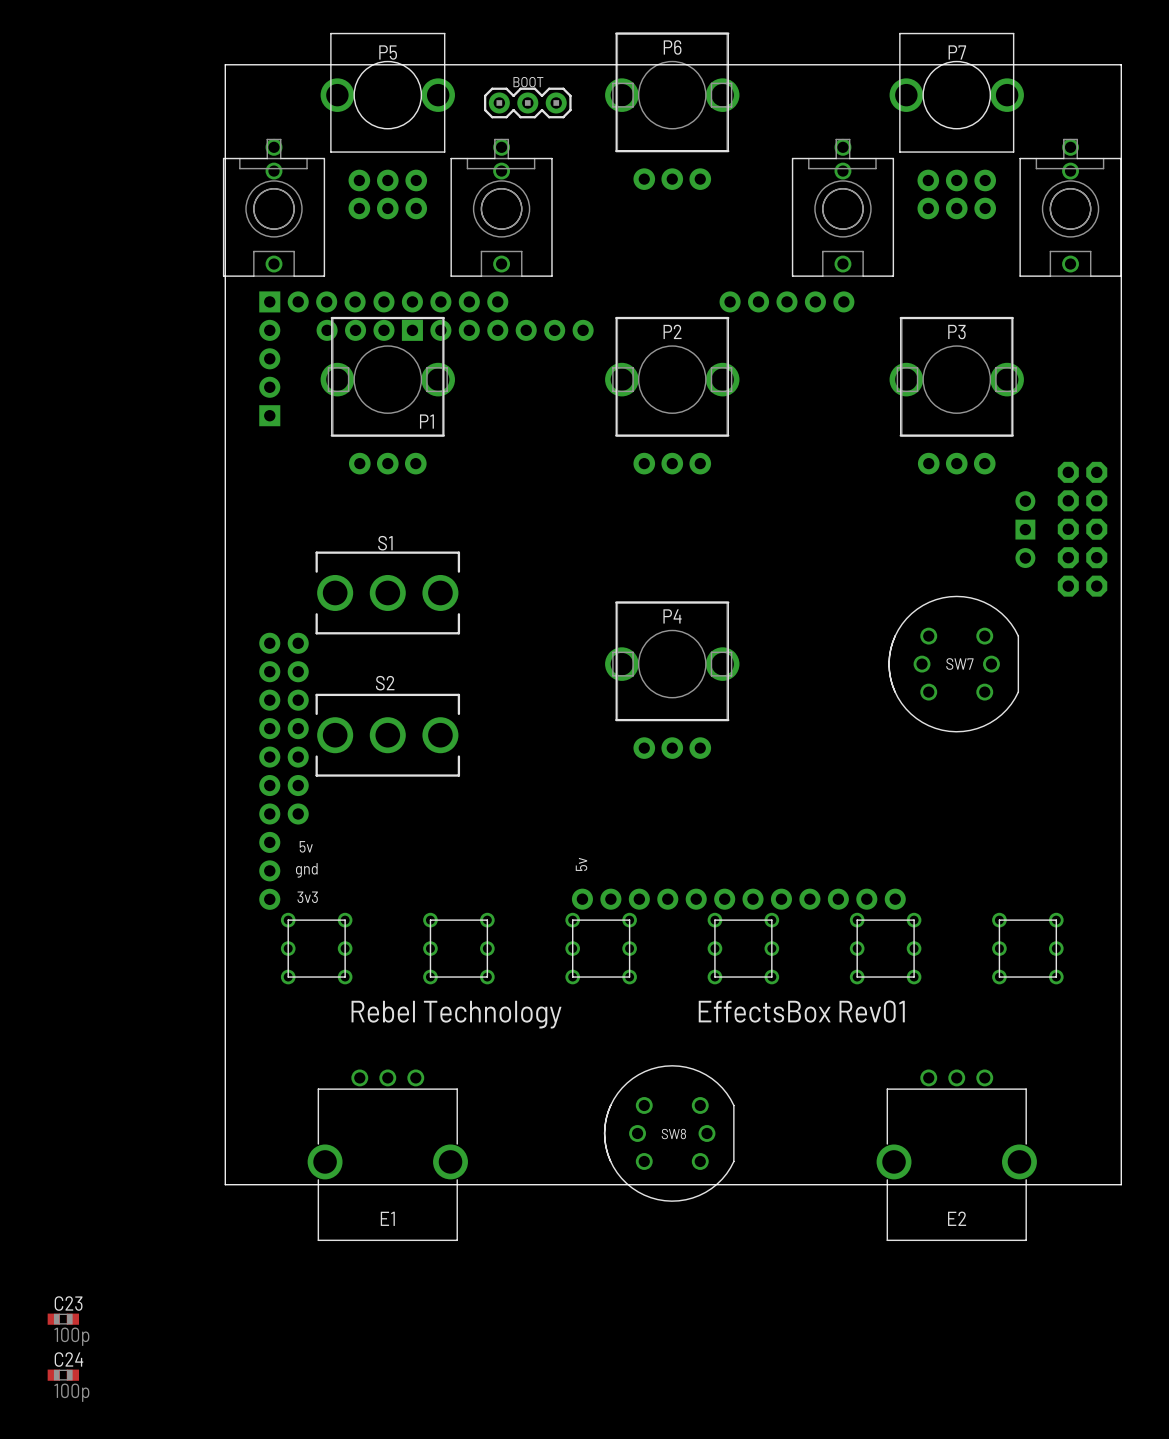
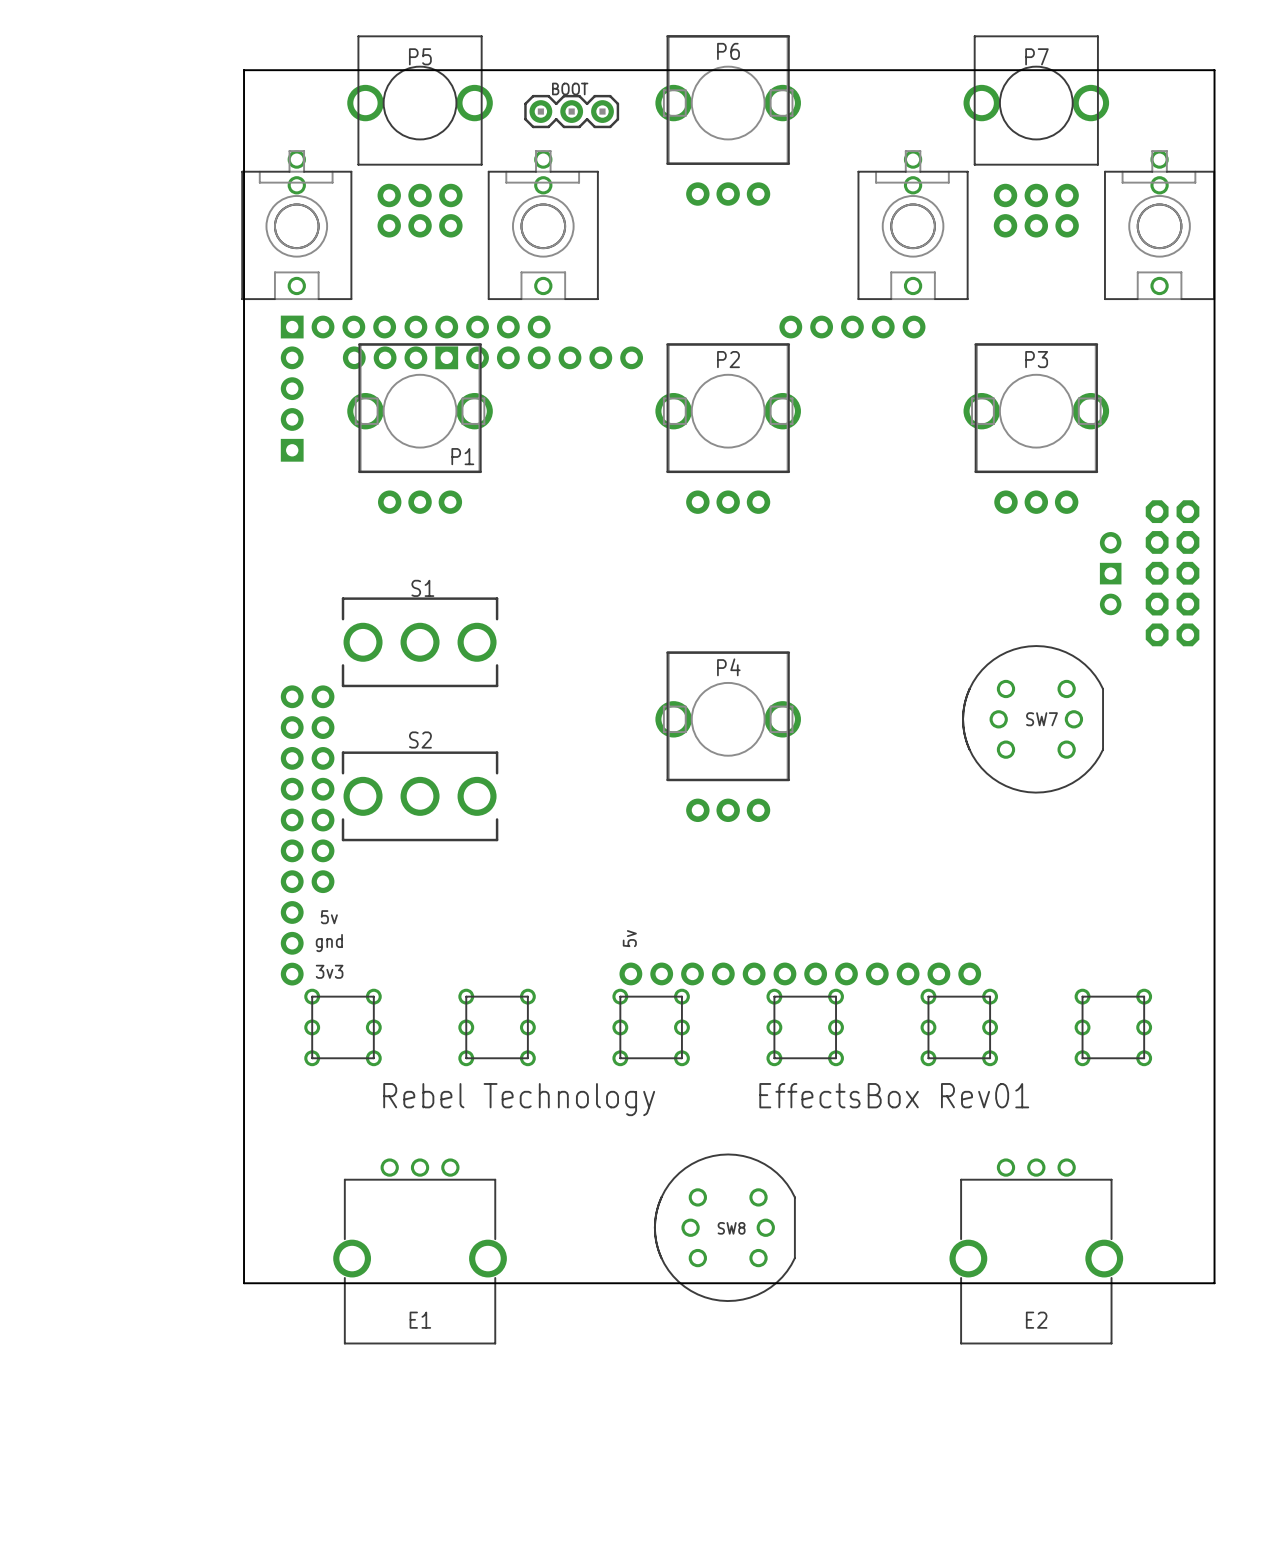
C23: 100p (63, 1319) -> none
C24: 100p (63, 1375) -> none

